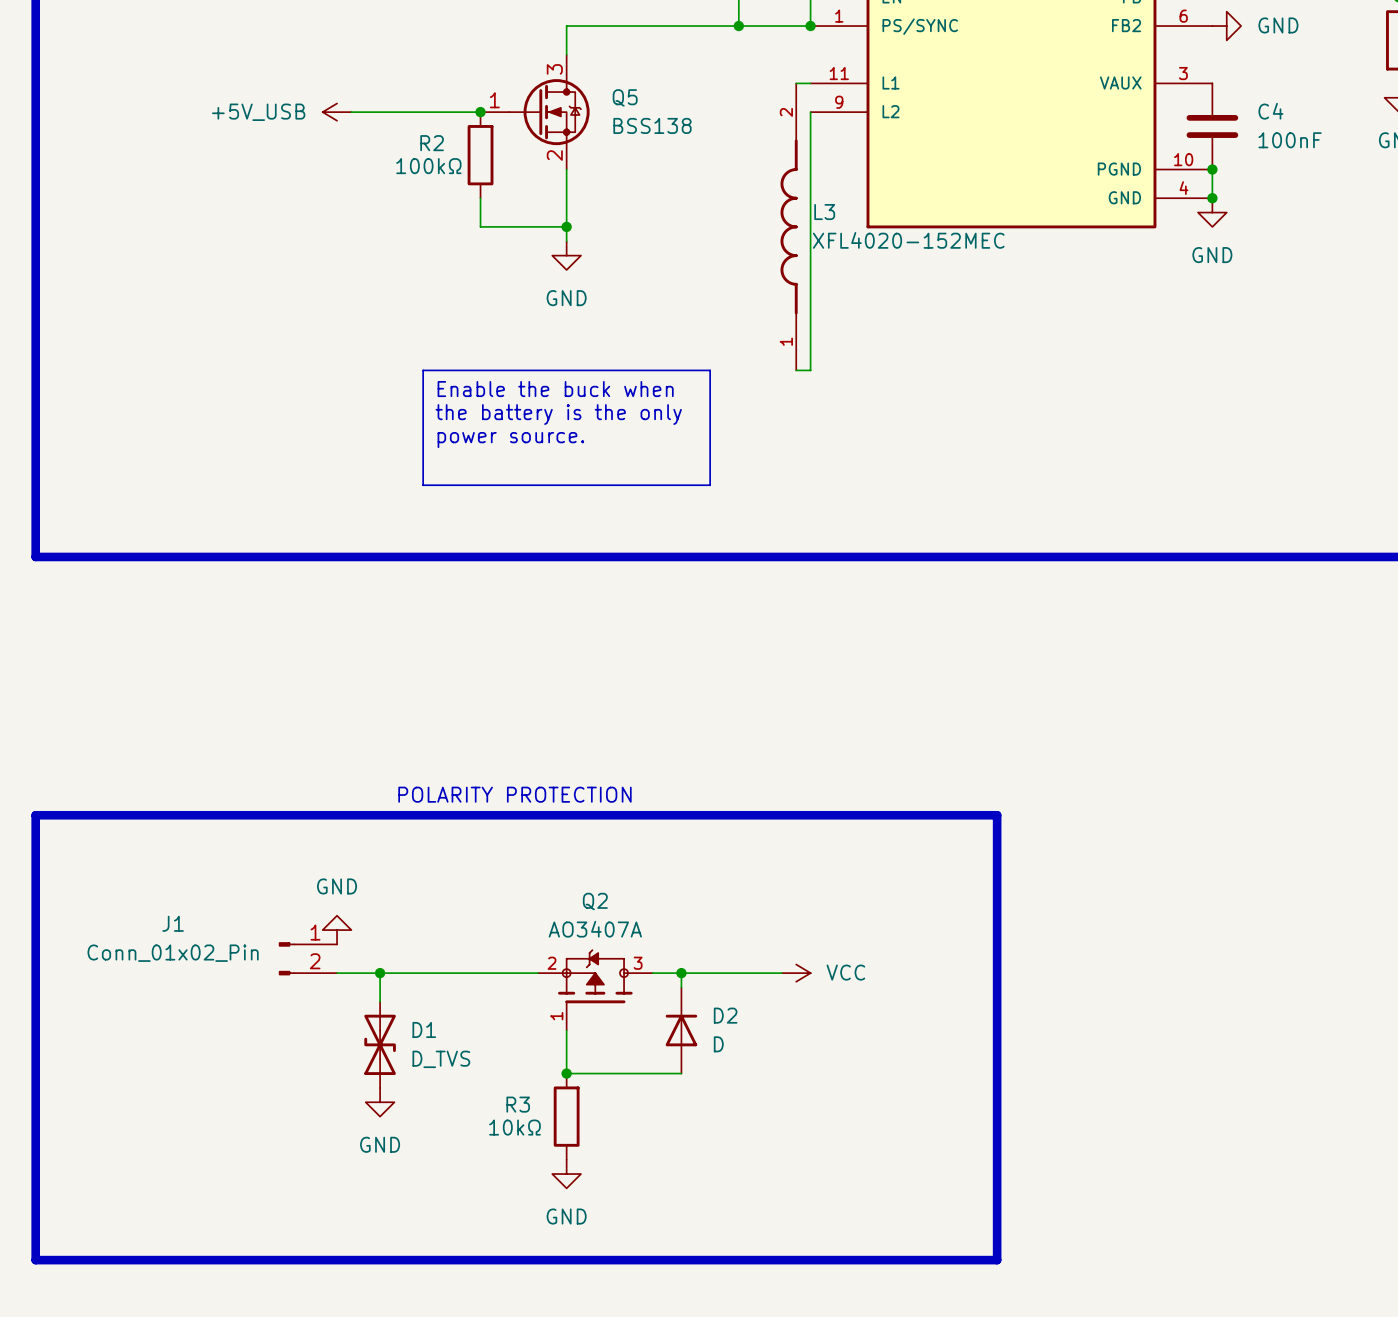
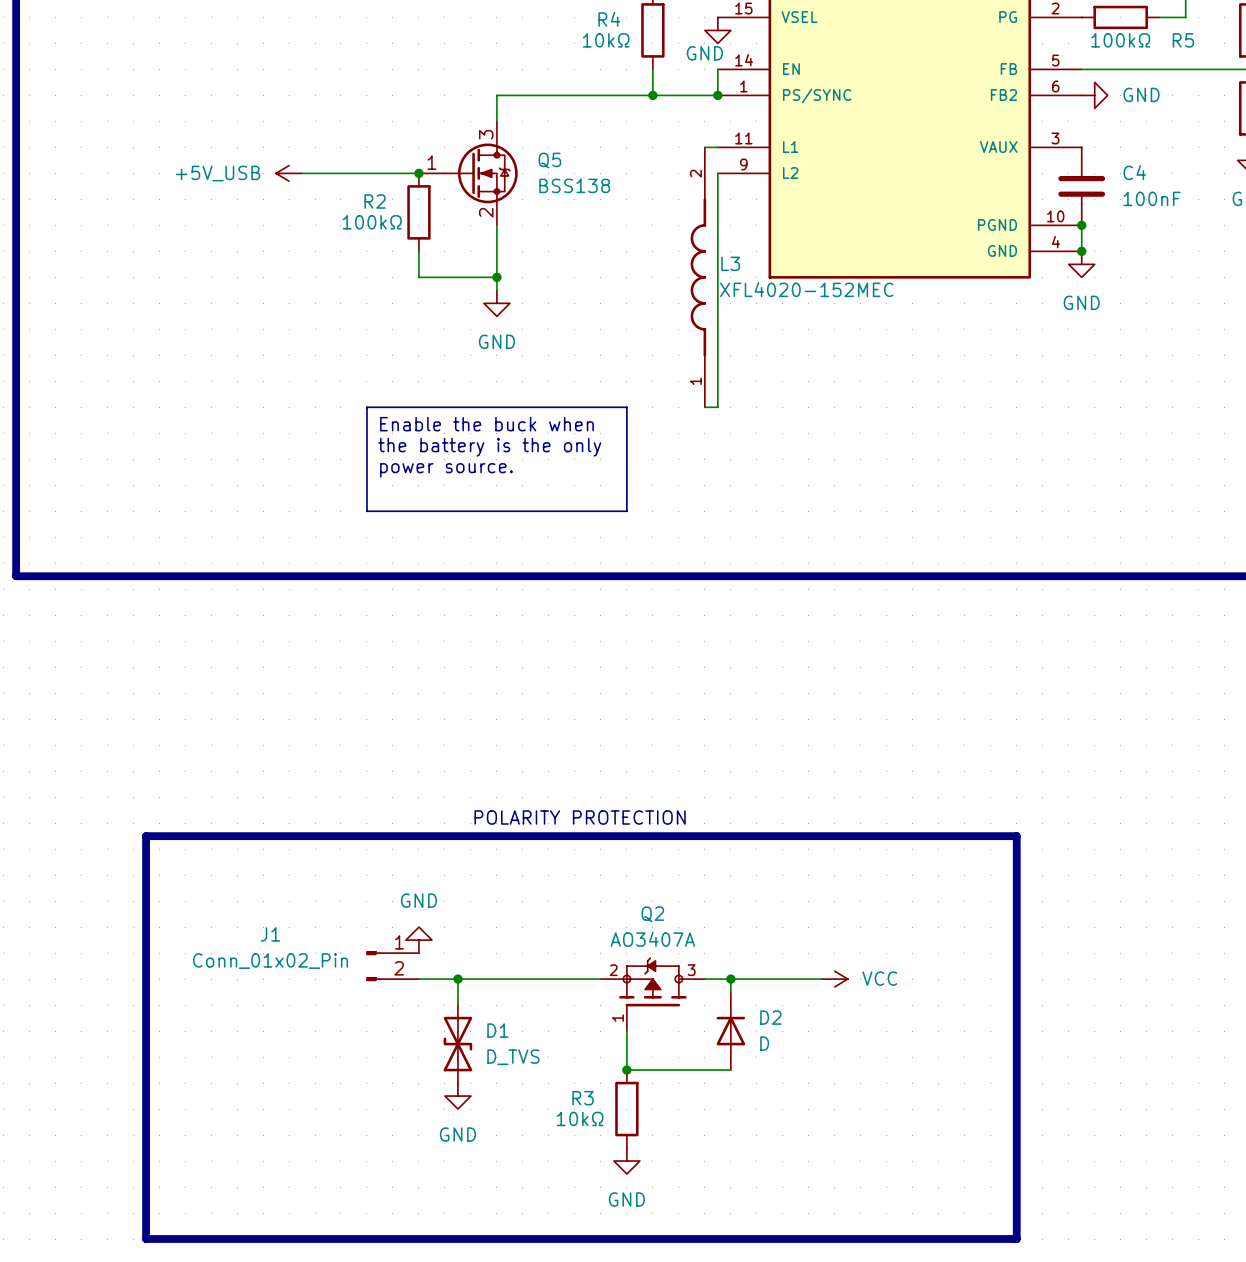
text position: POLARITY PROTECTION (514, 794) -> POLARITY PROTECTION (580, 817)
line: (35, 815) (997, 815) (997, 1260) (35, 1260) (35, 815) -> (146, 836) (1016, 836) (1016, 1239) (146, 1239) (146, 836)
power symbol: GND (337, 930) -> none
J1 position: (307, 958) -> (392, 966)
power symbol: none -> GND (418, 940)
wire: (337, 973) (537, 973) -> (418, 979) (600, 979)
wire: (380, 973) (380, 1001) -> (457, 979) (457, 1005)
junction: (380, 973) -> none
wire: (652, 973) (781, 973) -> (704, 979) (821, 979)
wire: (681, 973) (681, 987) -> (730, 979) (730, 992)
junction: (681, 973) -> none
power symbol position: VCC (796, 973) -> VCC (834, 979)
Q2 position: (595, 989) -> (652, 994)
junction: none -> (457, 979)
junction: none -> (730, 979)
wire: (566, 1030) (566, 1073) (681, 1073) -> (626, 1031) (626, 1070) (730, 1070)
D2 position: (681, 1030) -> (730, 1031)
D1 position: (380, 1044) -> (457, 1044)
junction: (566, 1073) -> none
power symbol: GND (380, 1102) -> none
junction: none -> (626, 1070)
R3 position: (566, 1116) -> (626, 1109)
power symbol position: GND (566, 1174) -> GND (457, 1096)
power symbol: none -> GND (626, 1161)

